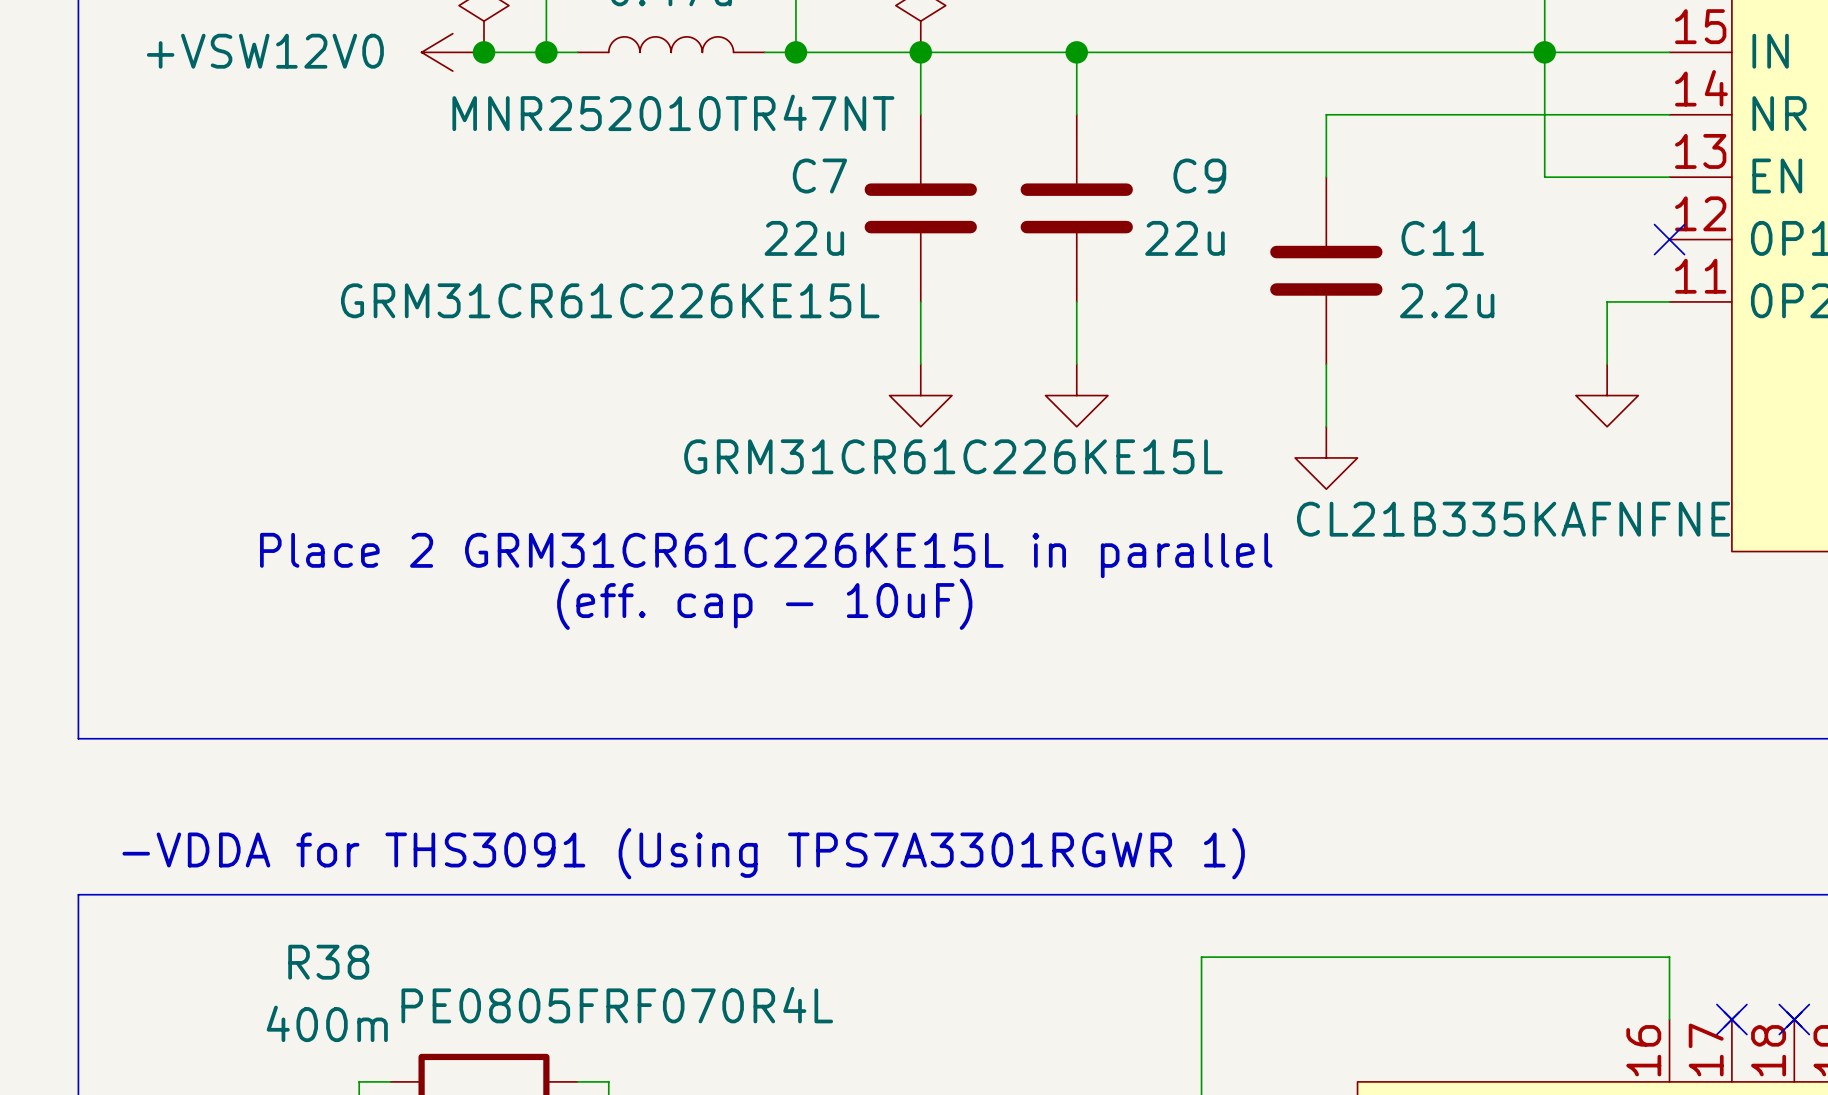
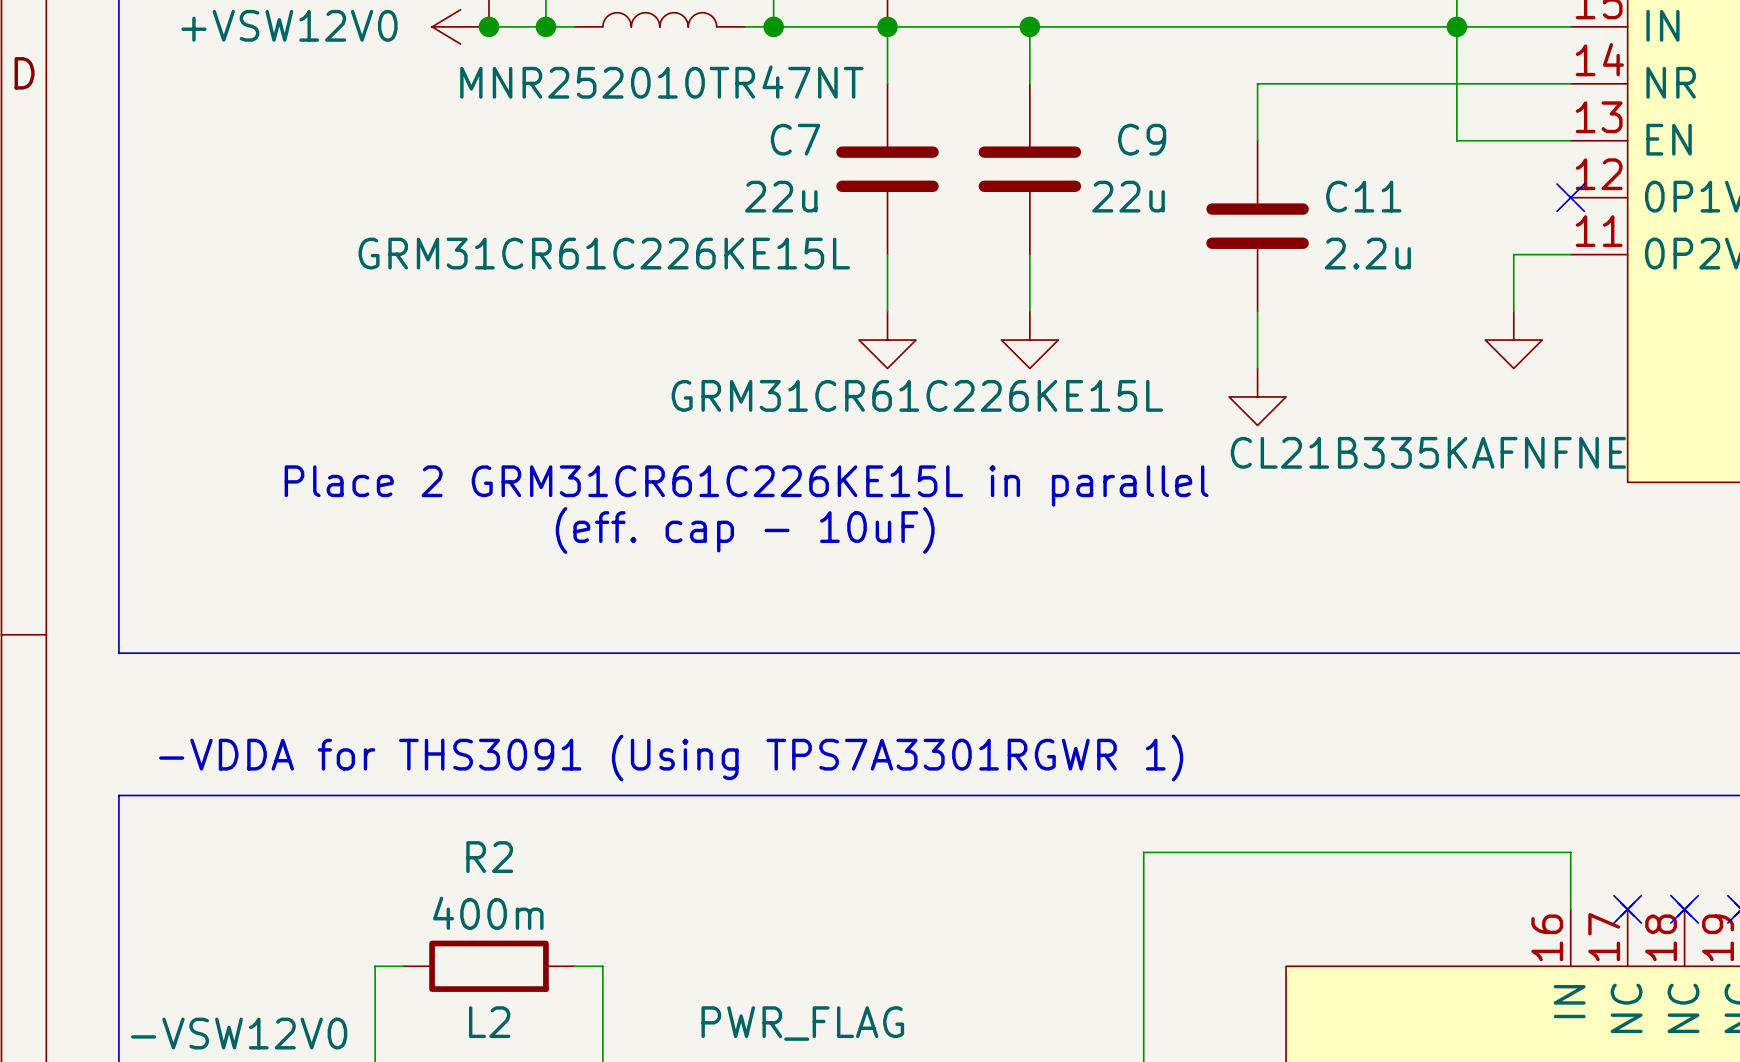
R38 name: R38 (328, 962) -> R2 (489, 857)
R38 text: PE0805FRF070R4L (617, 1005) -> none
R38 value position: 400m (327, 1023) -> 400m (488, 913)

